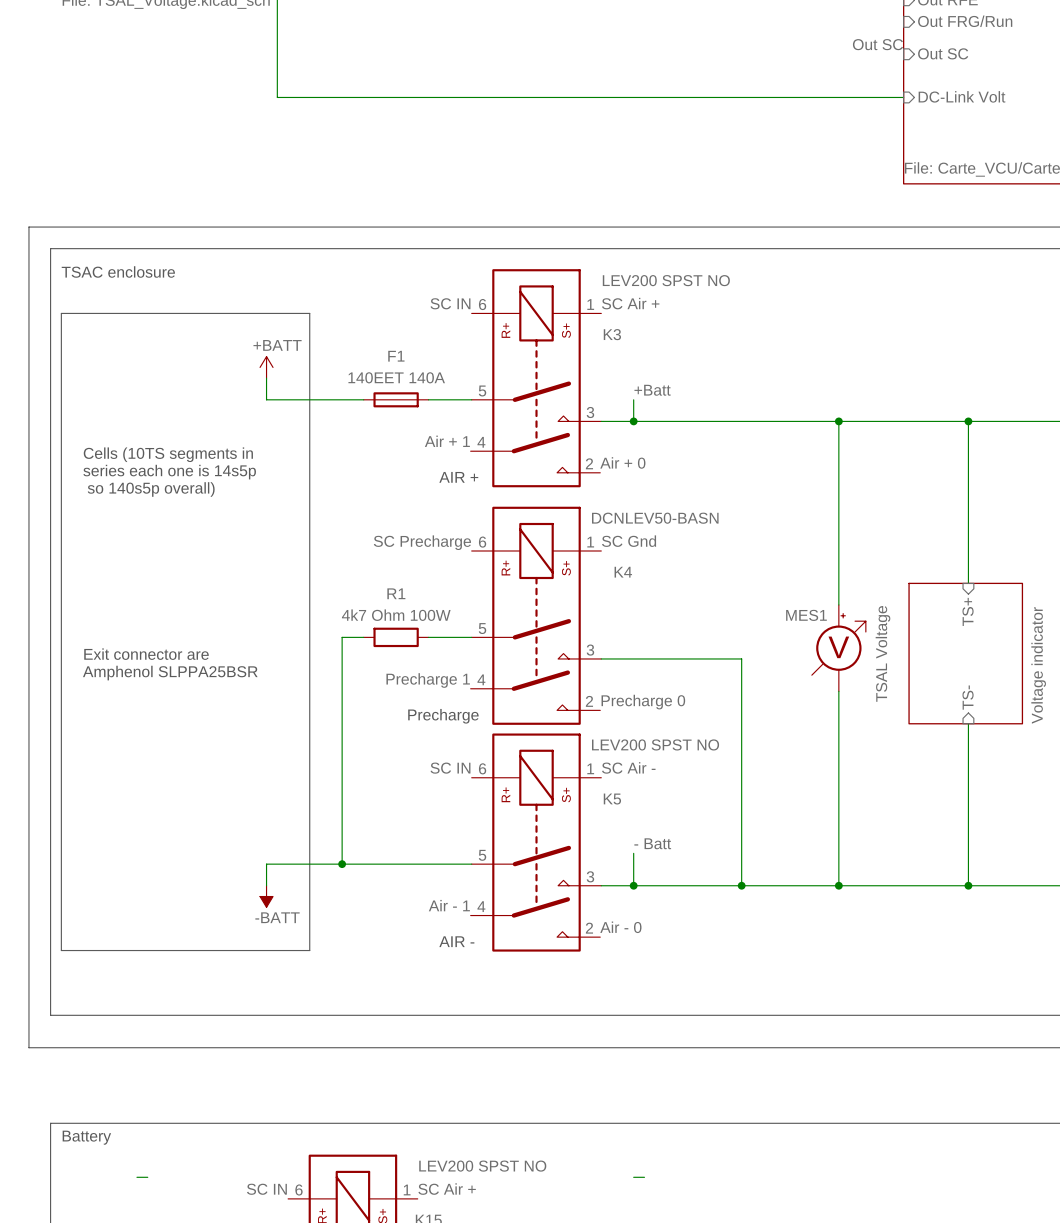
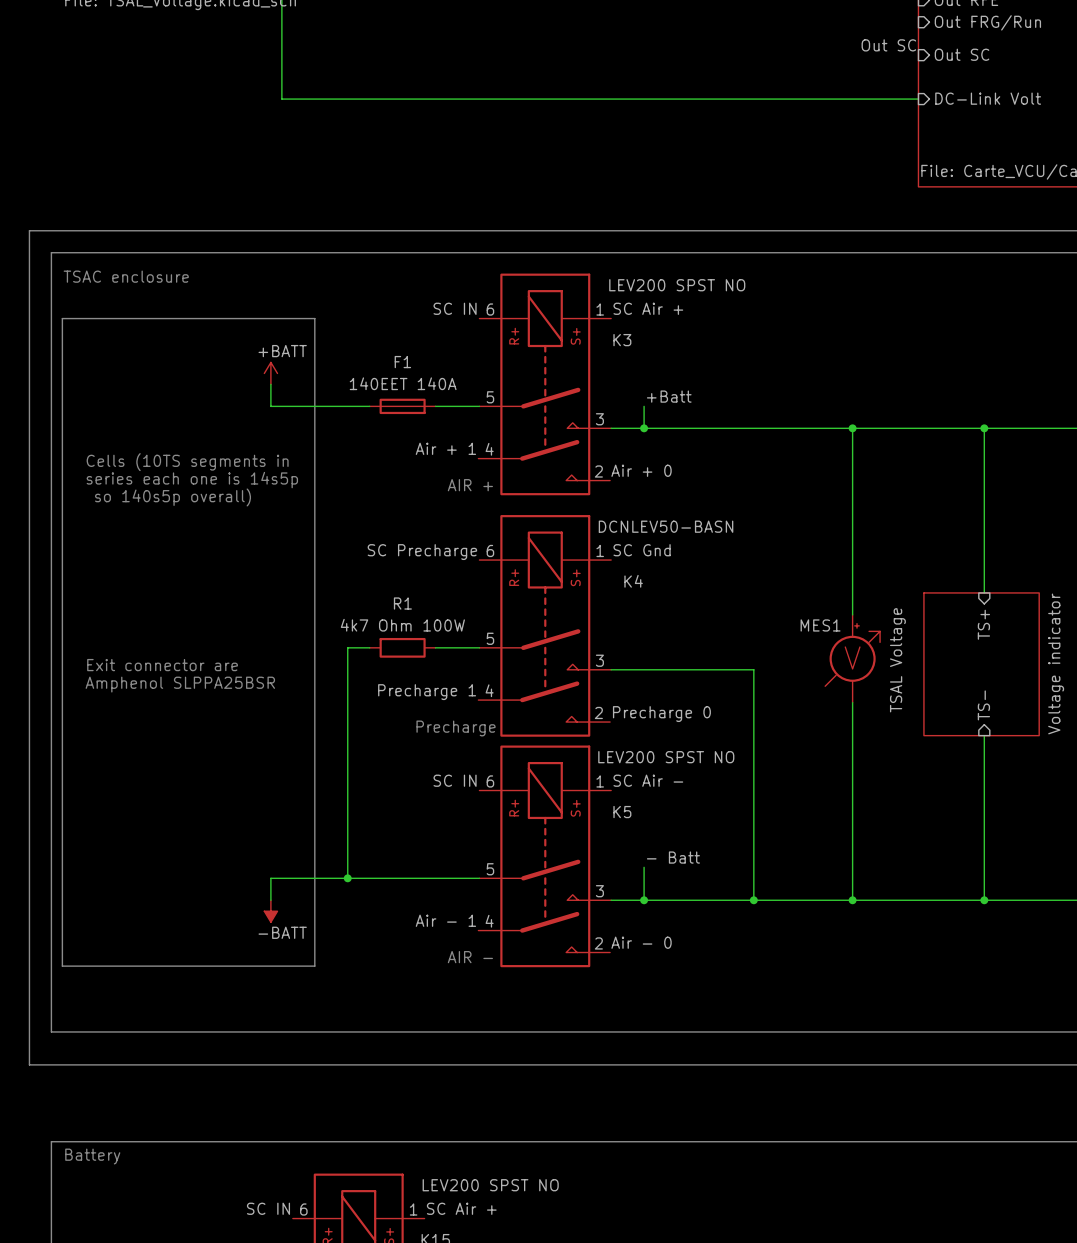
wire: (136, 1177) (147, 1177) -> none
wire: (633, 1177) (644, 1177) -> none

